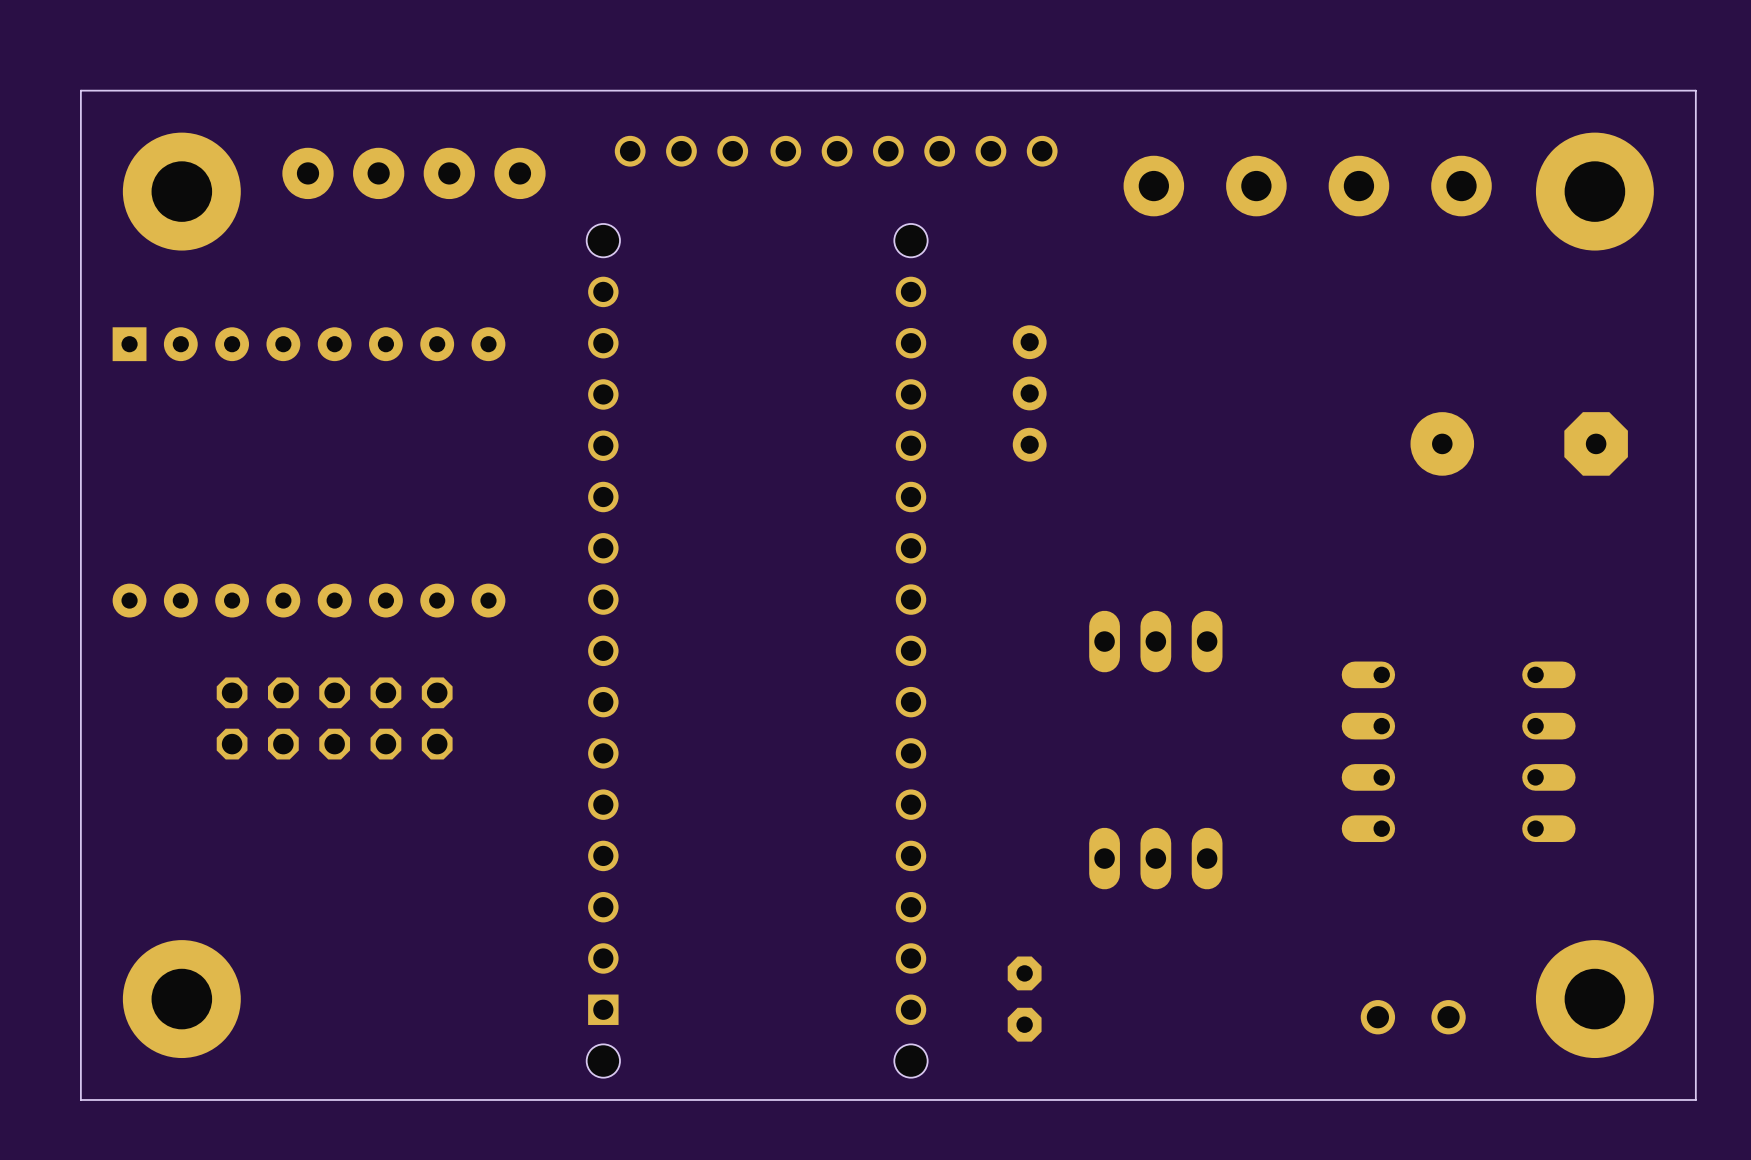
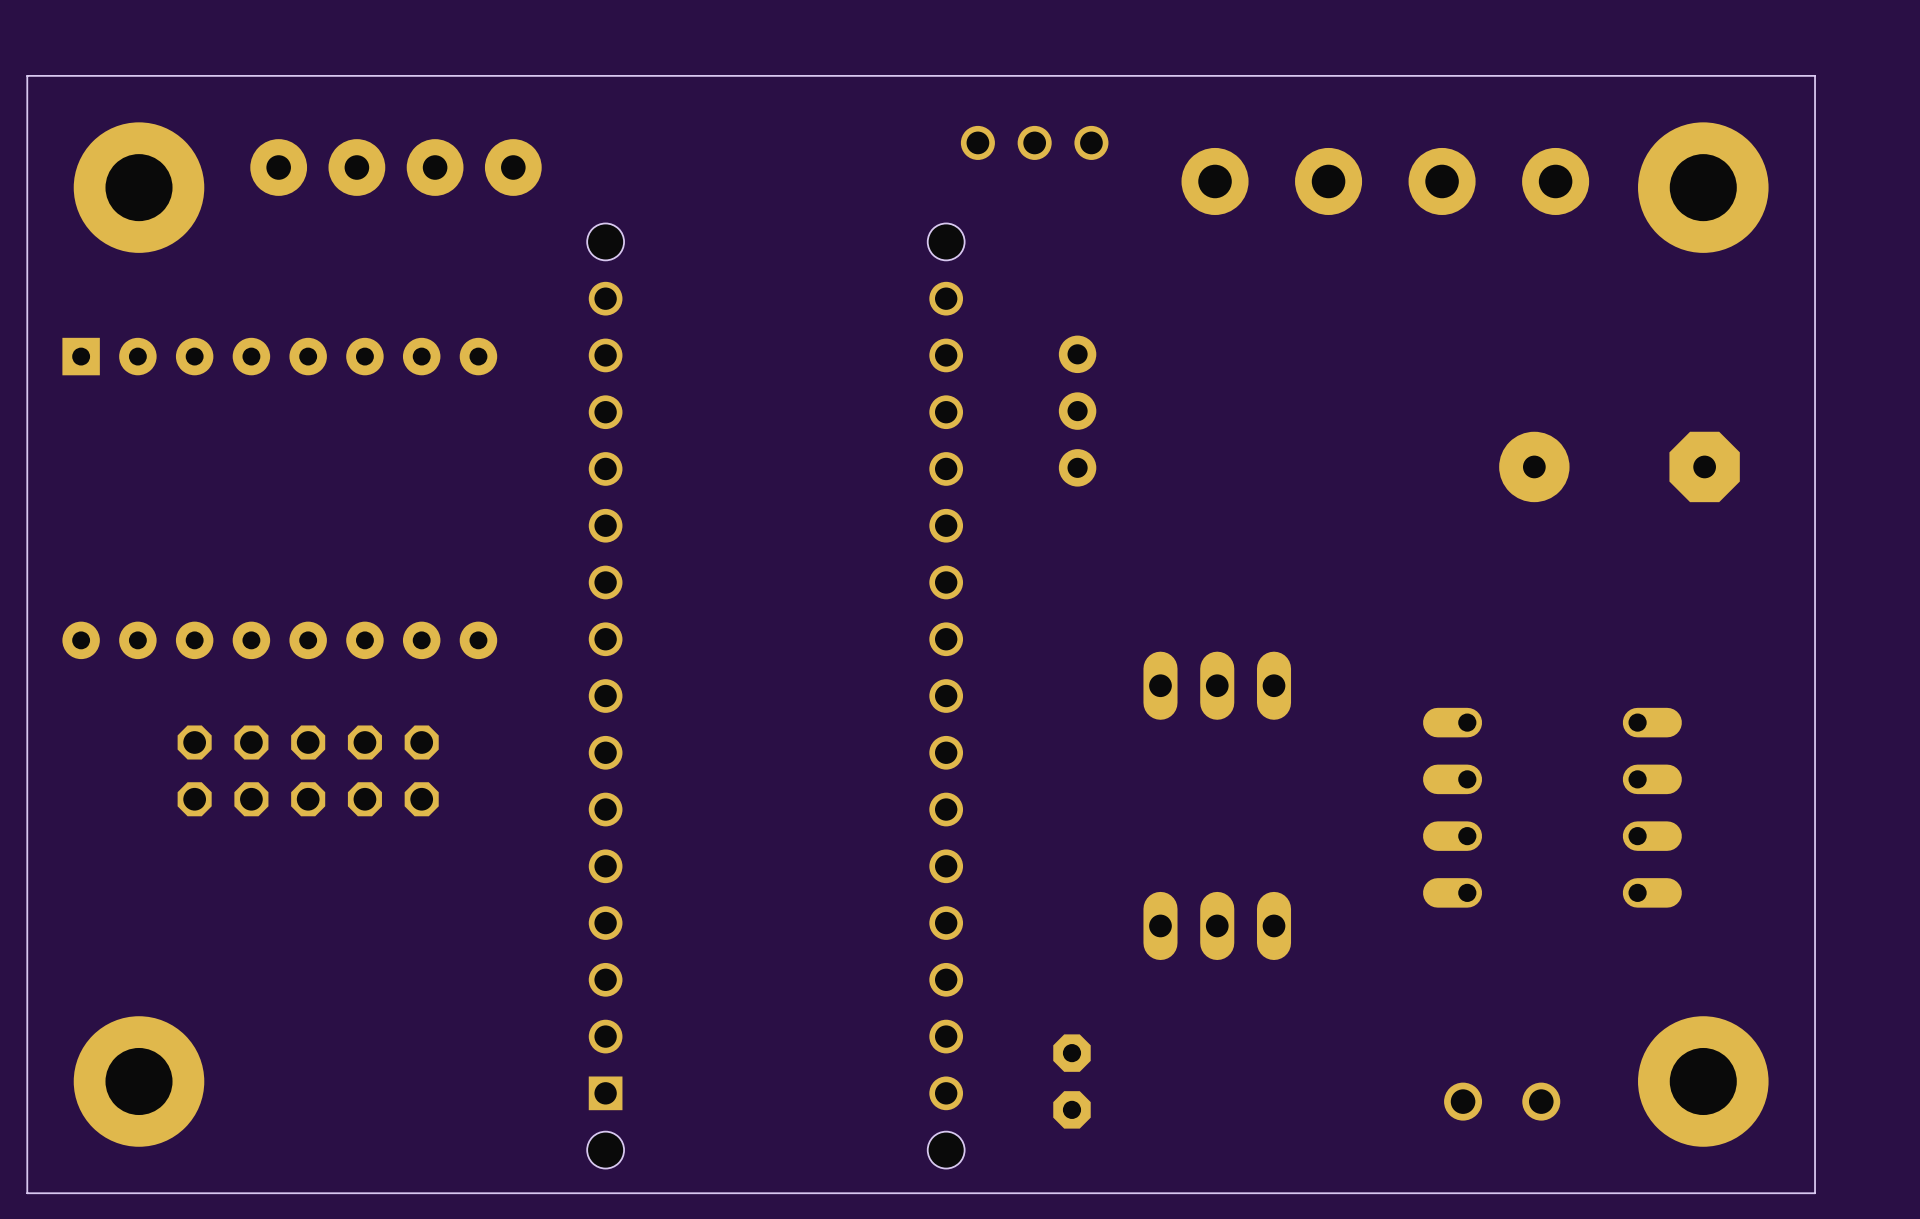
part: (681, 151) -> none
part: (837, 151) -> none

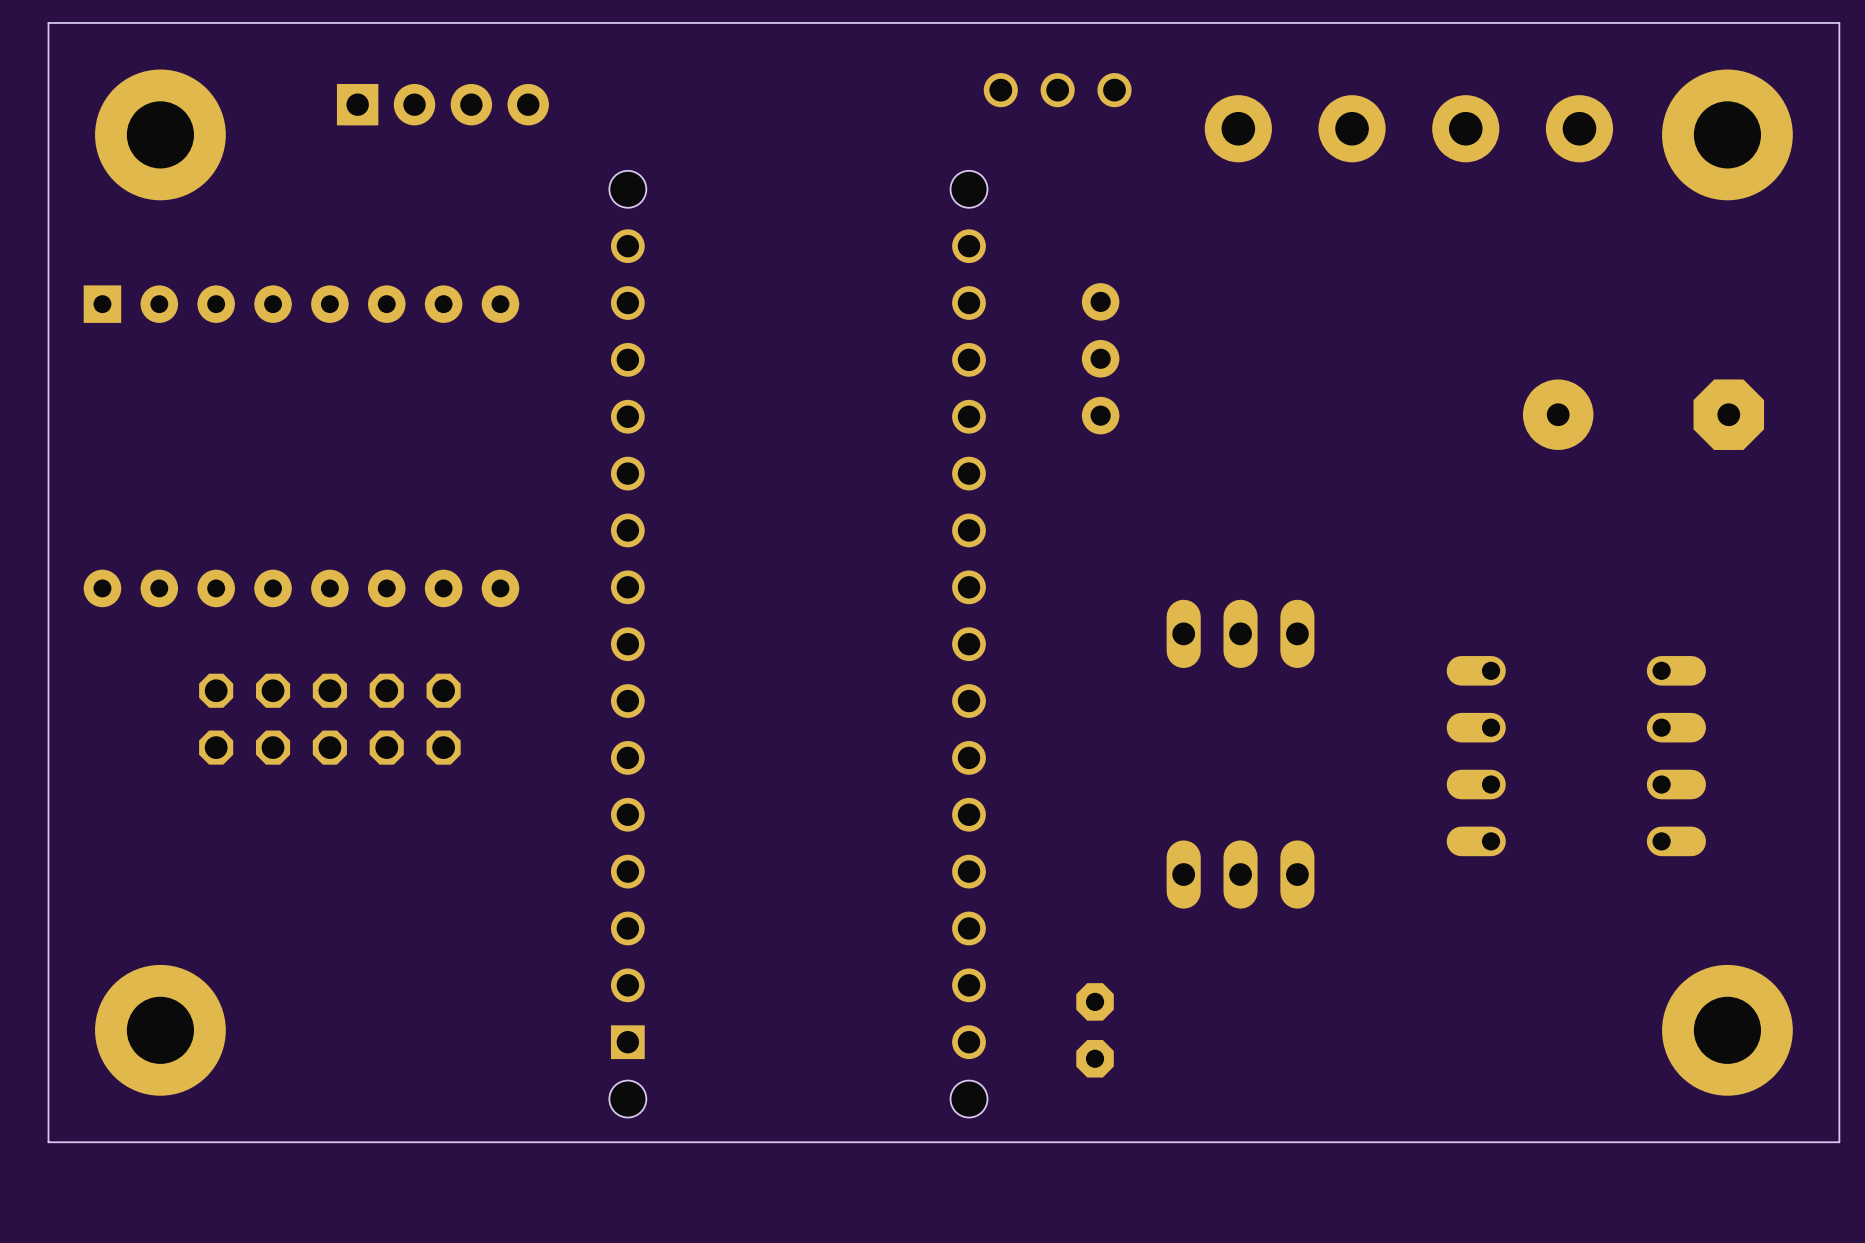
part: none -> (442, 104)
part: (395, 167) -> none
part: (1502, 1101) -> none

